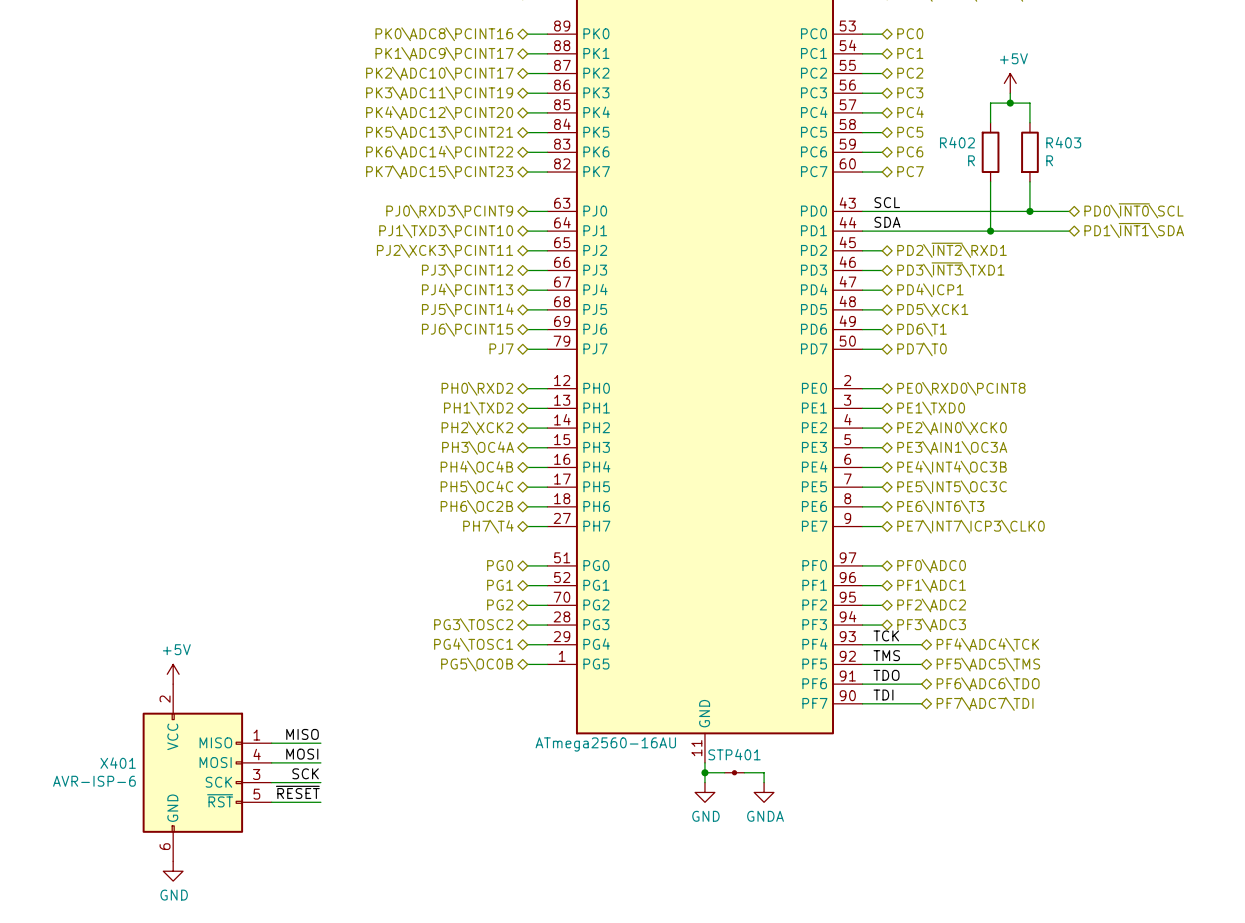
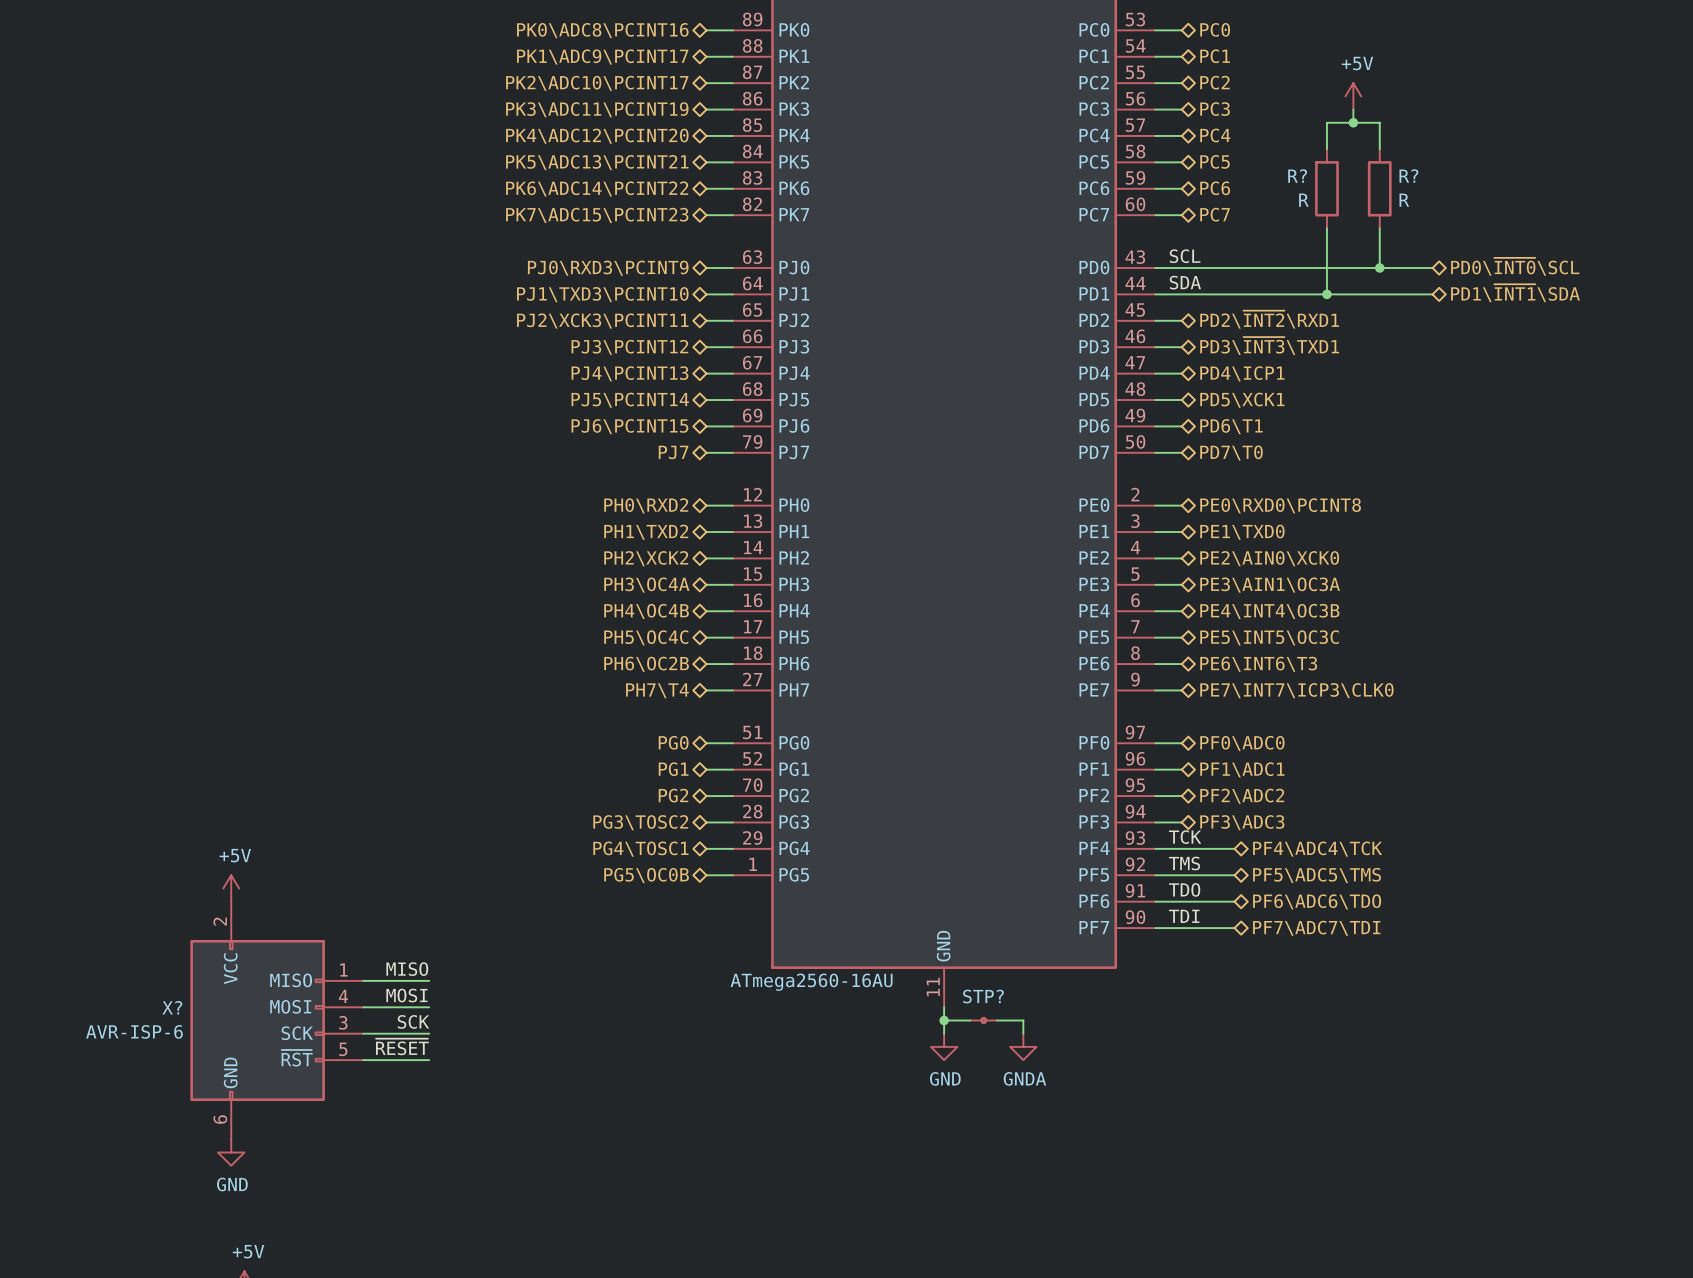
R402 name: R402 (957, 142) -> R? (1297, 176)
R403 name: R403 (1063, 142) -> R? (1408, 176)
STP401 name: STP401 (734, 754) -> STP? (983, 996)
X401 name: X401 (118, 763) -> X? (172, 1007)

